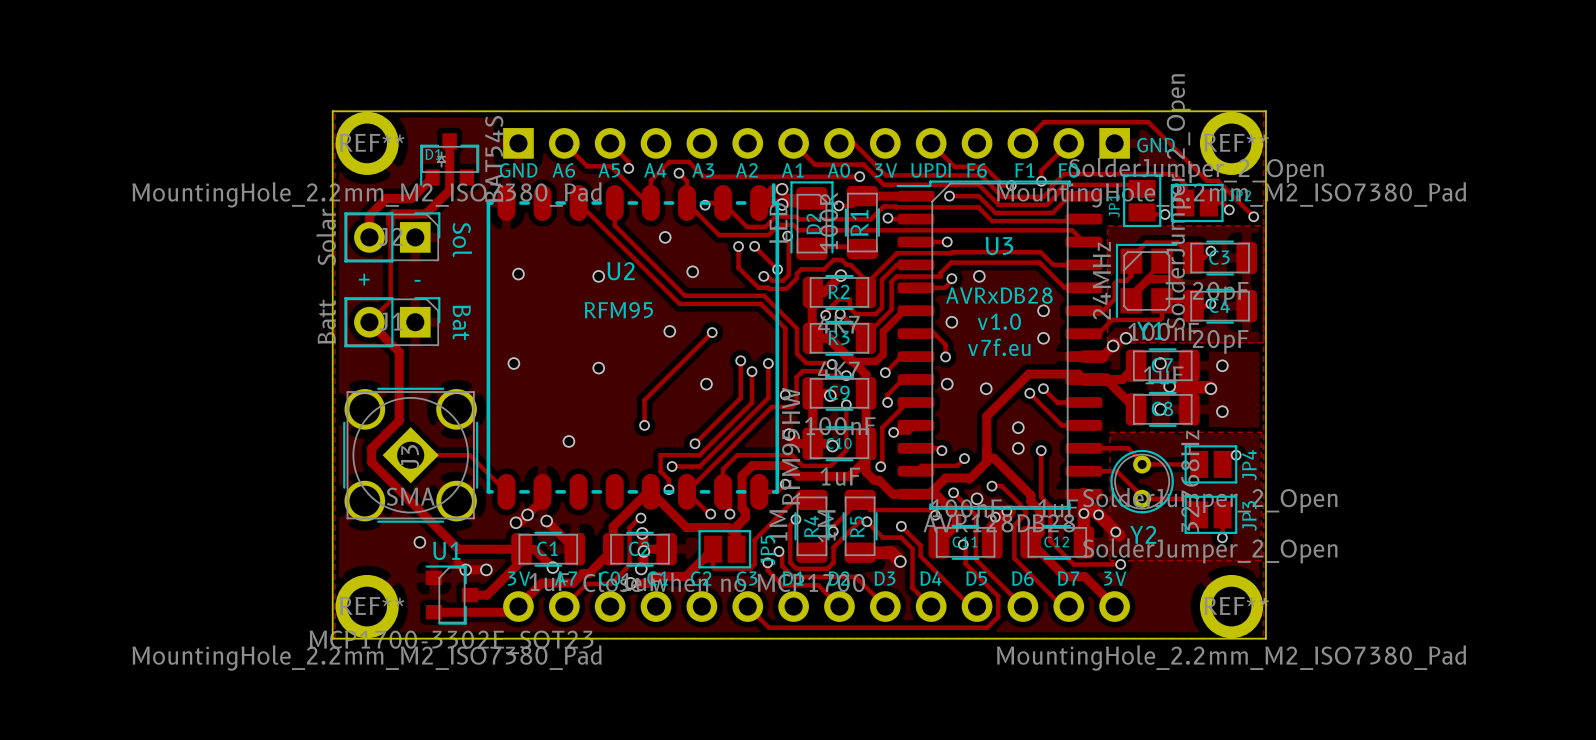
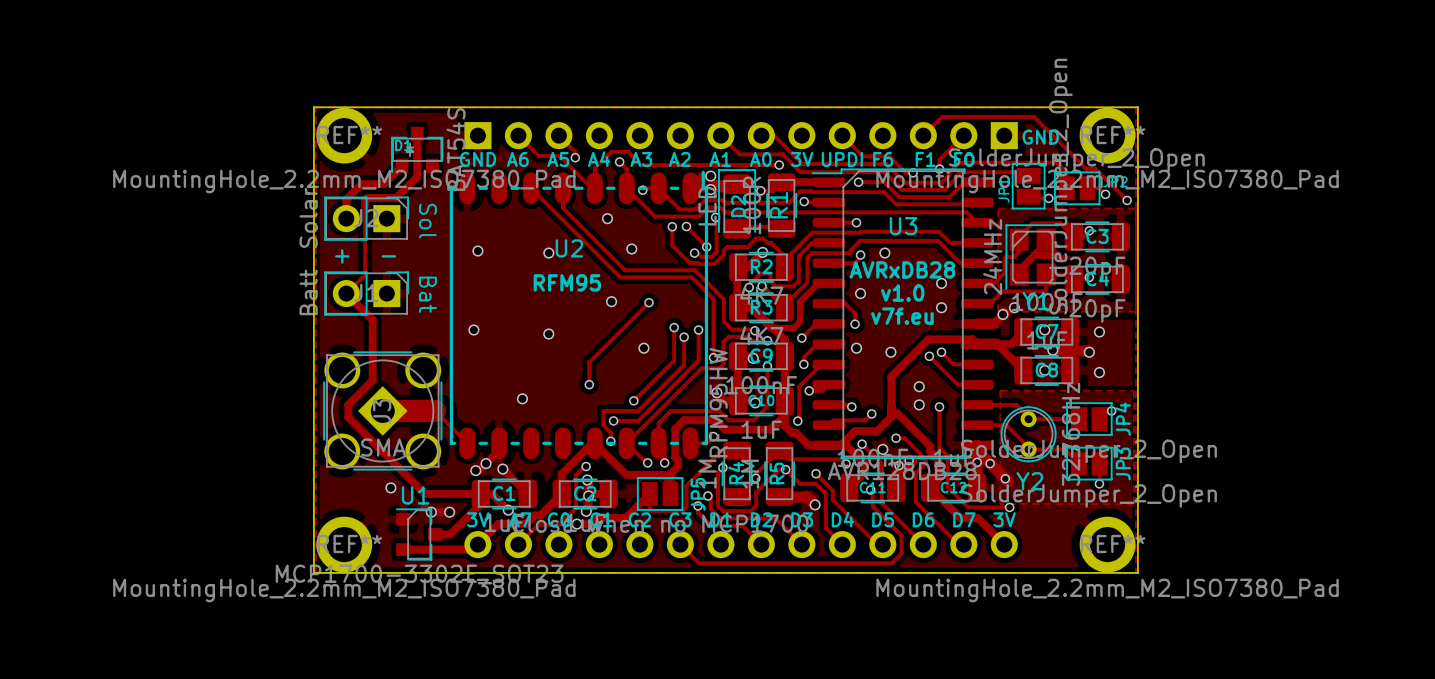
track width: thin (410, 455) (469, 455) -> thick (382, 410) (434, 410)

